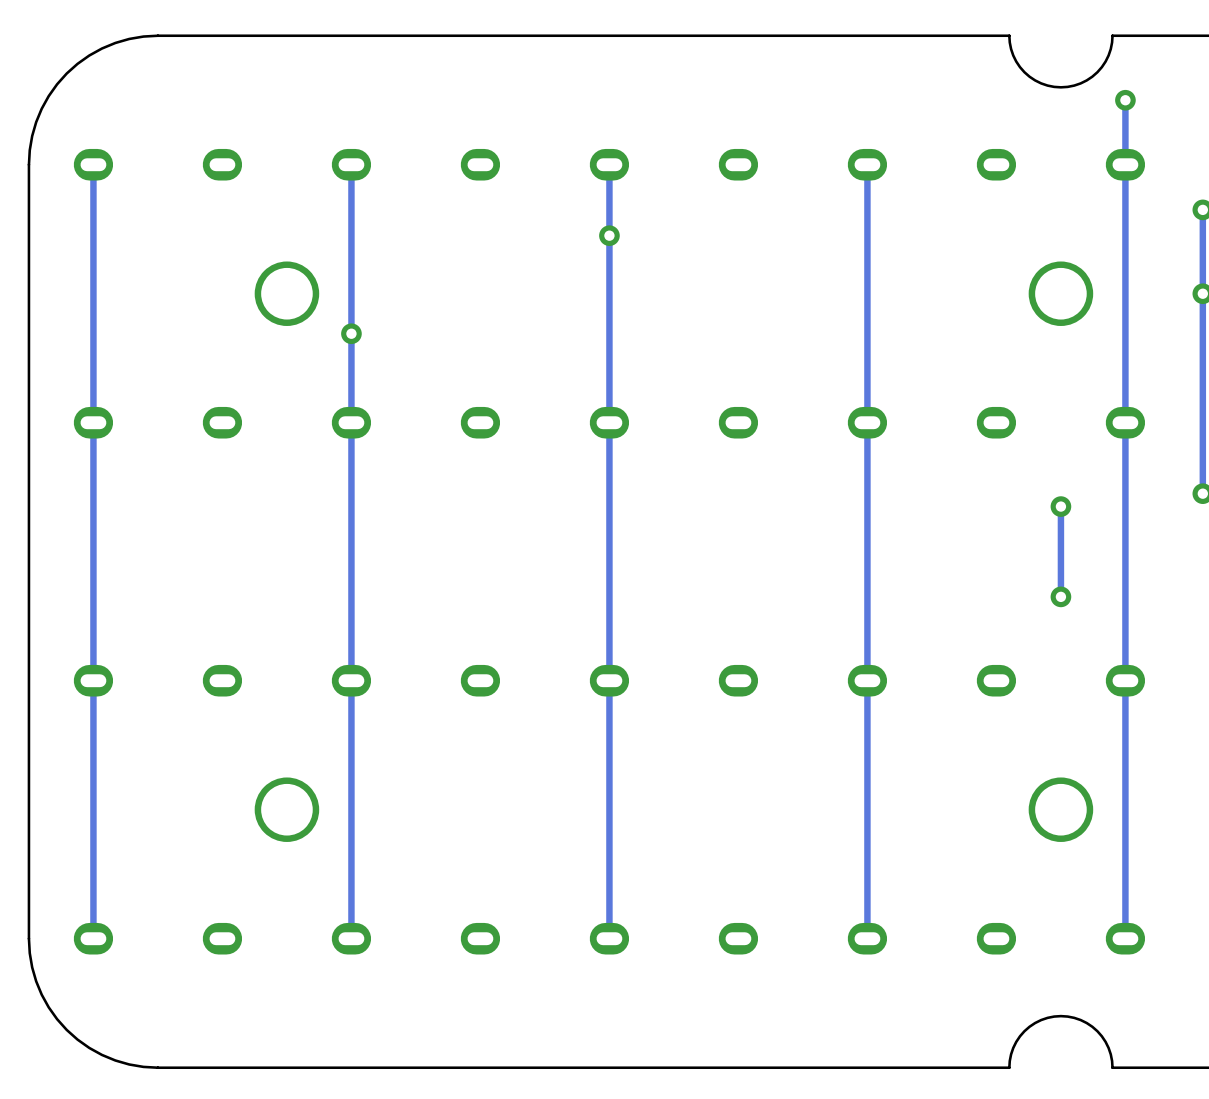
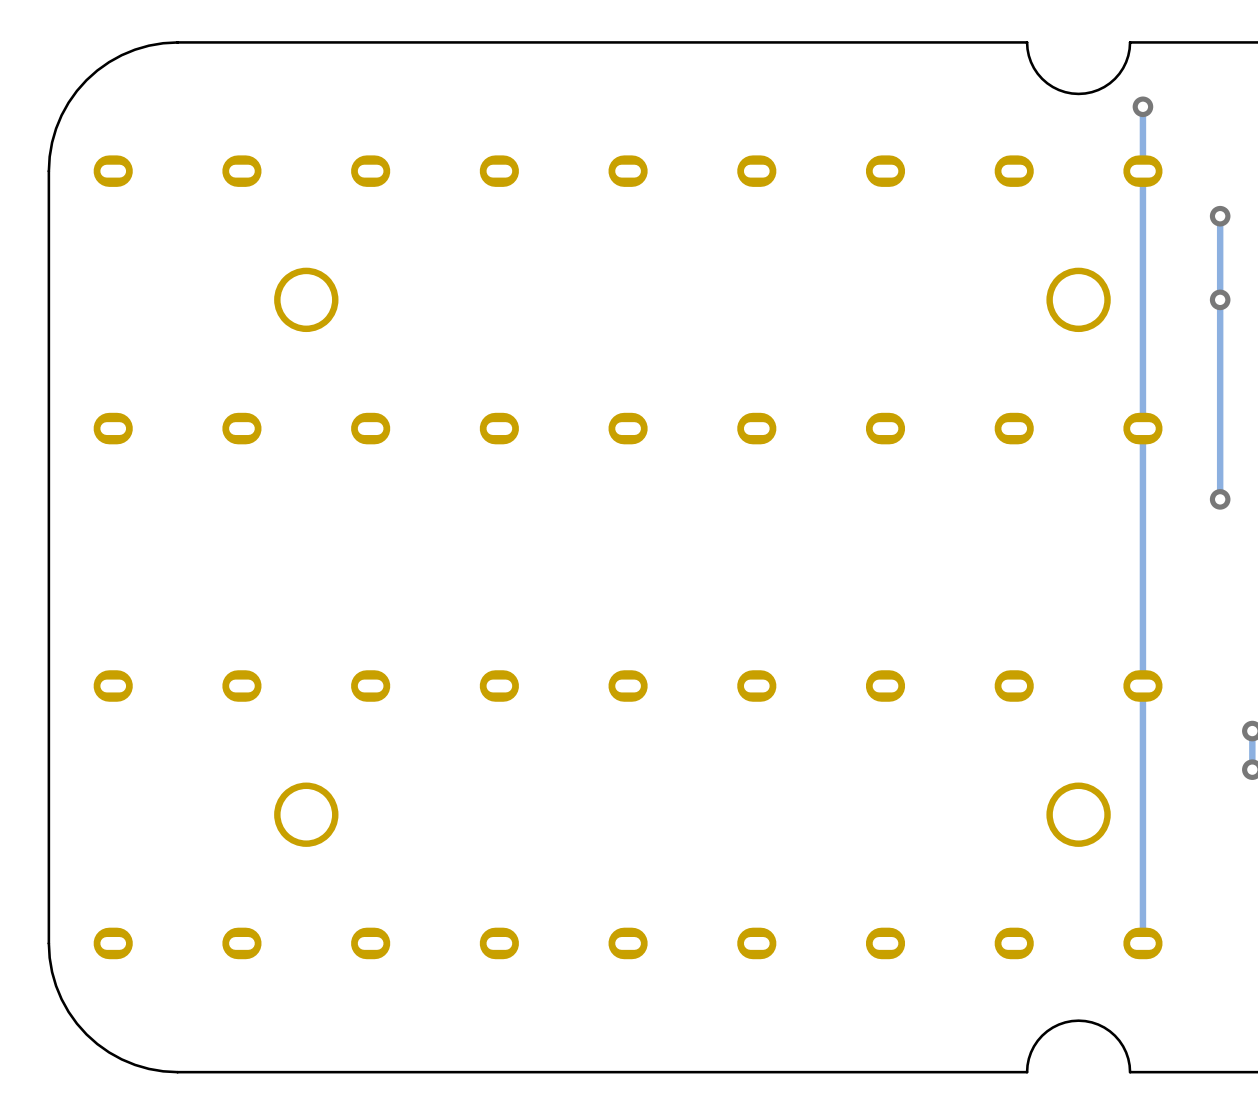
track: (93, 164) (93, 938) -> none
track: (351, 164) (351, 938) -> none
track: (609, 164) (609, 938) -> none
track: (867, 164) (867, 938) -> none
via: (609, 235) -> none
via: (351, 333) -> none
track: (1060, 506) (1060, 596) -> none
via: (1060, 506) -> none
via: (1060, 596) -> none

